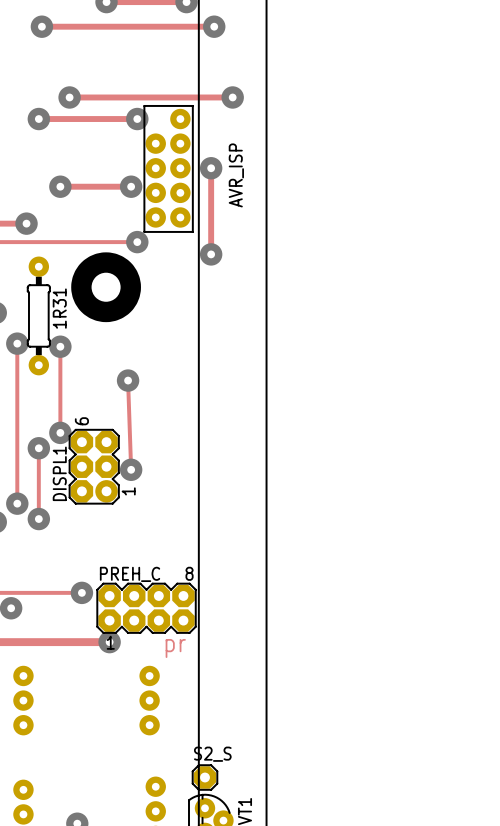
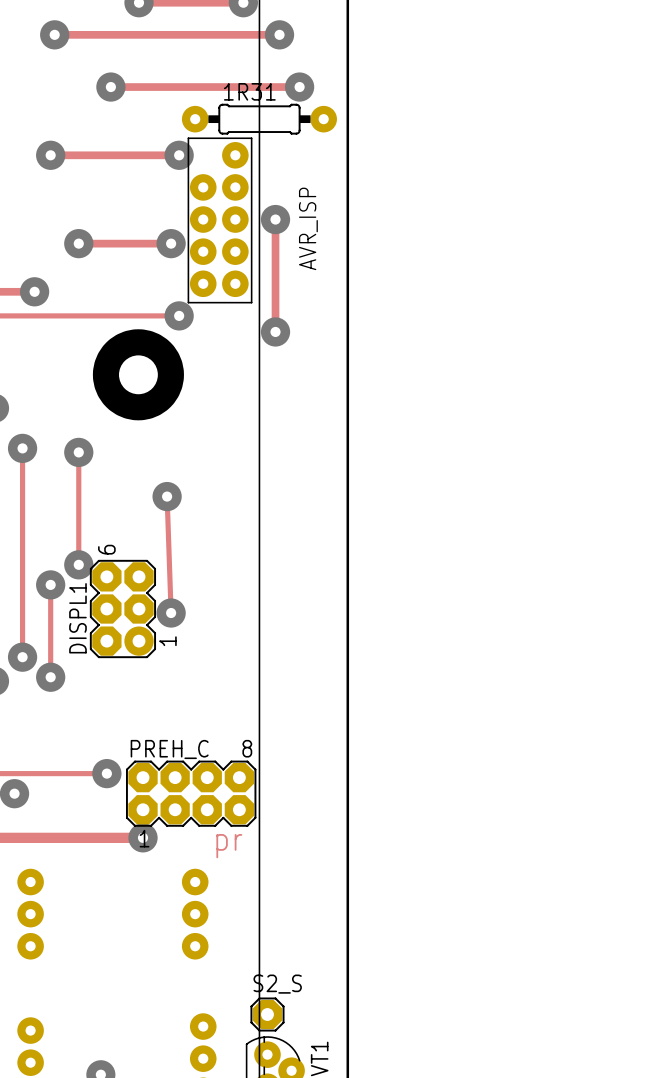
track: none -> (110, 87) (299, 87)
track: (69, 97) (232, 97) -> none
via position: (69, 97) -> (110, 87)
via position: (232, 97) -> (299, 87)
1R31 name position: 1R31 (59, 308) -> 1R31 (249, 91)
1R31 rotation: 0° (38, 315) -> 90° clockwise (259, 119)
1R31 position: (38, 315) -> (259, 119)

